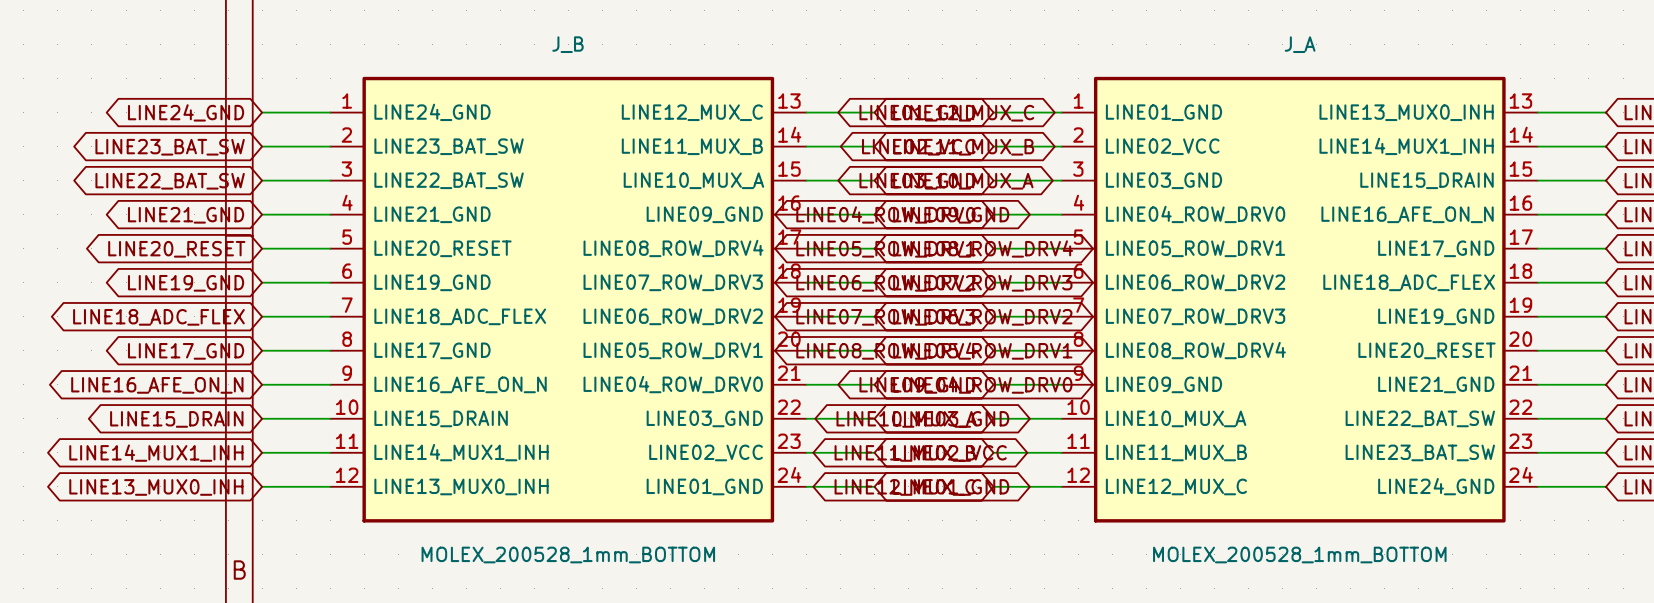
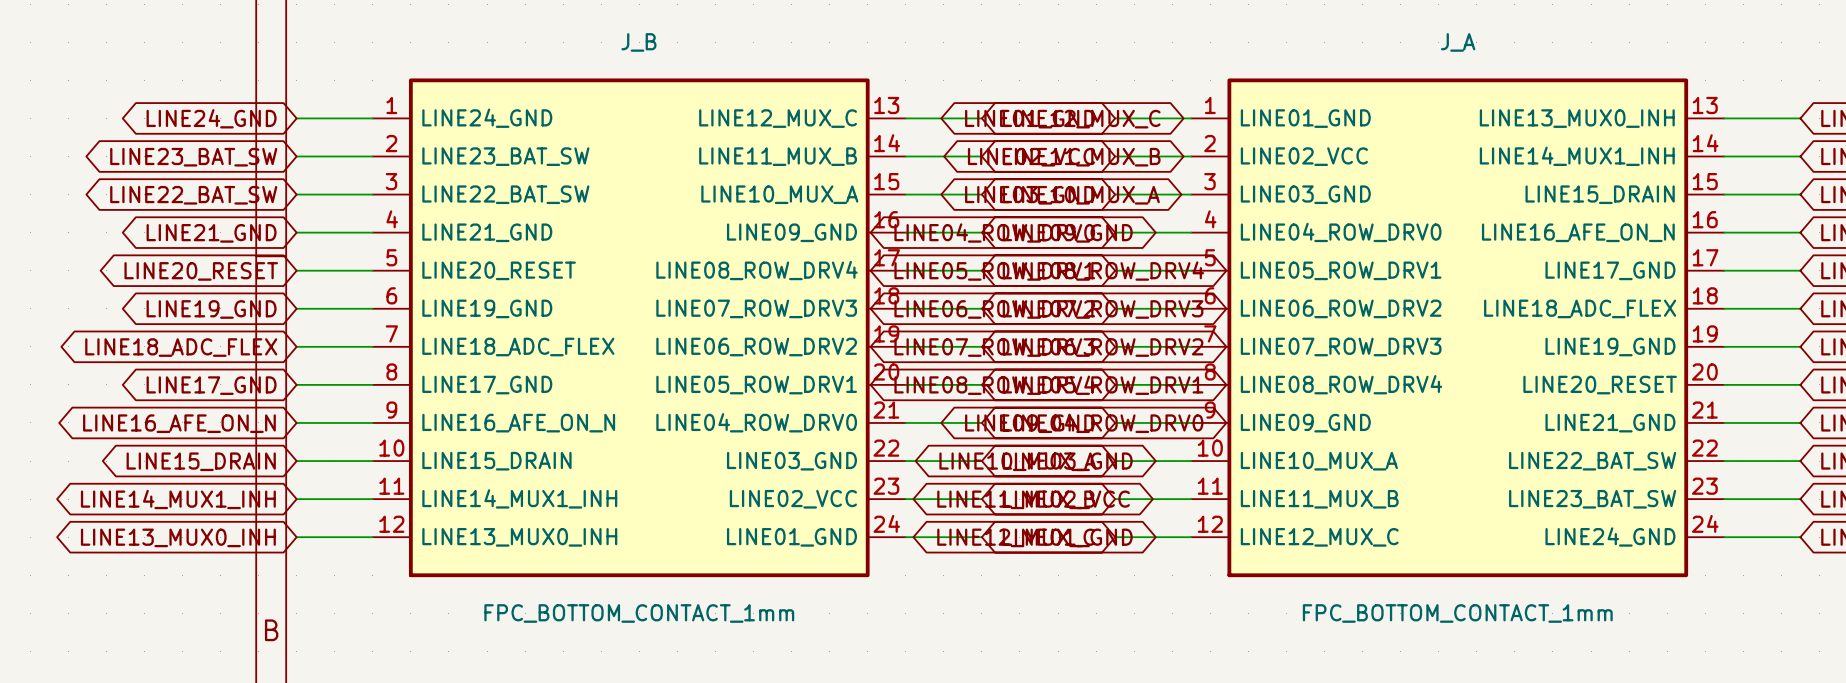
J_B value: MOLEX_200528_1mm_BOTTOM (568, 555) -> FPC_BOTTOM_CONTACT_1mm (639, 613)
J_A value: MOLEX_200528_1mm_BOTTOM (1299, 555) -> FPC_BOTTOM_CONTACT_1mm (1457, 613)

